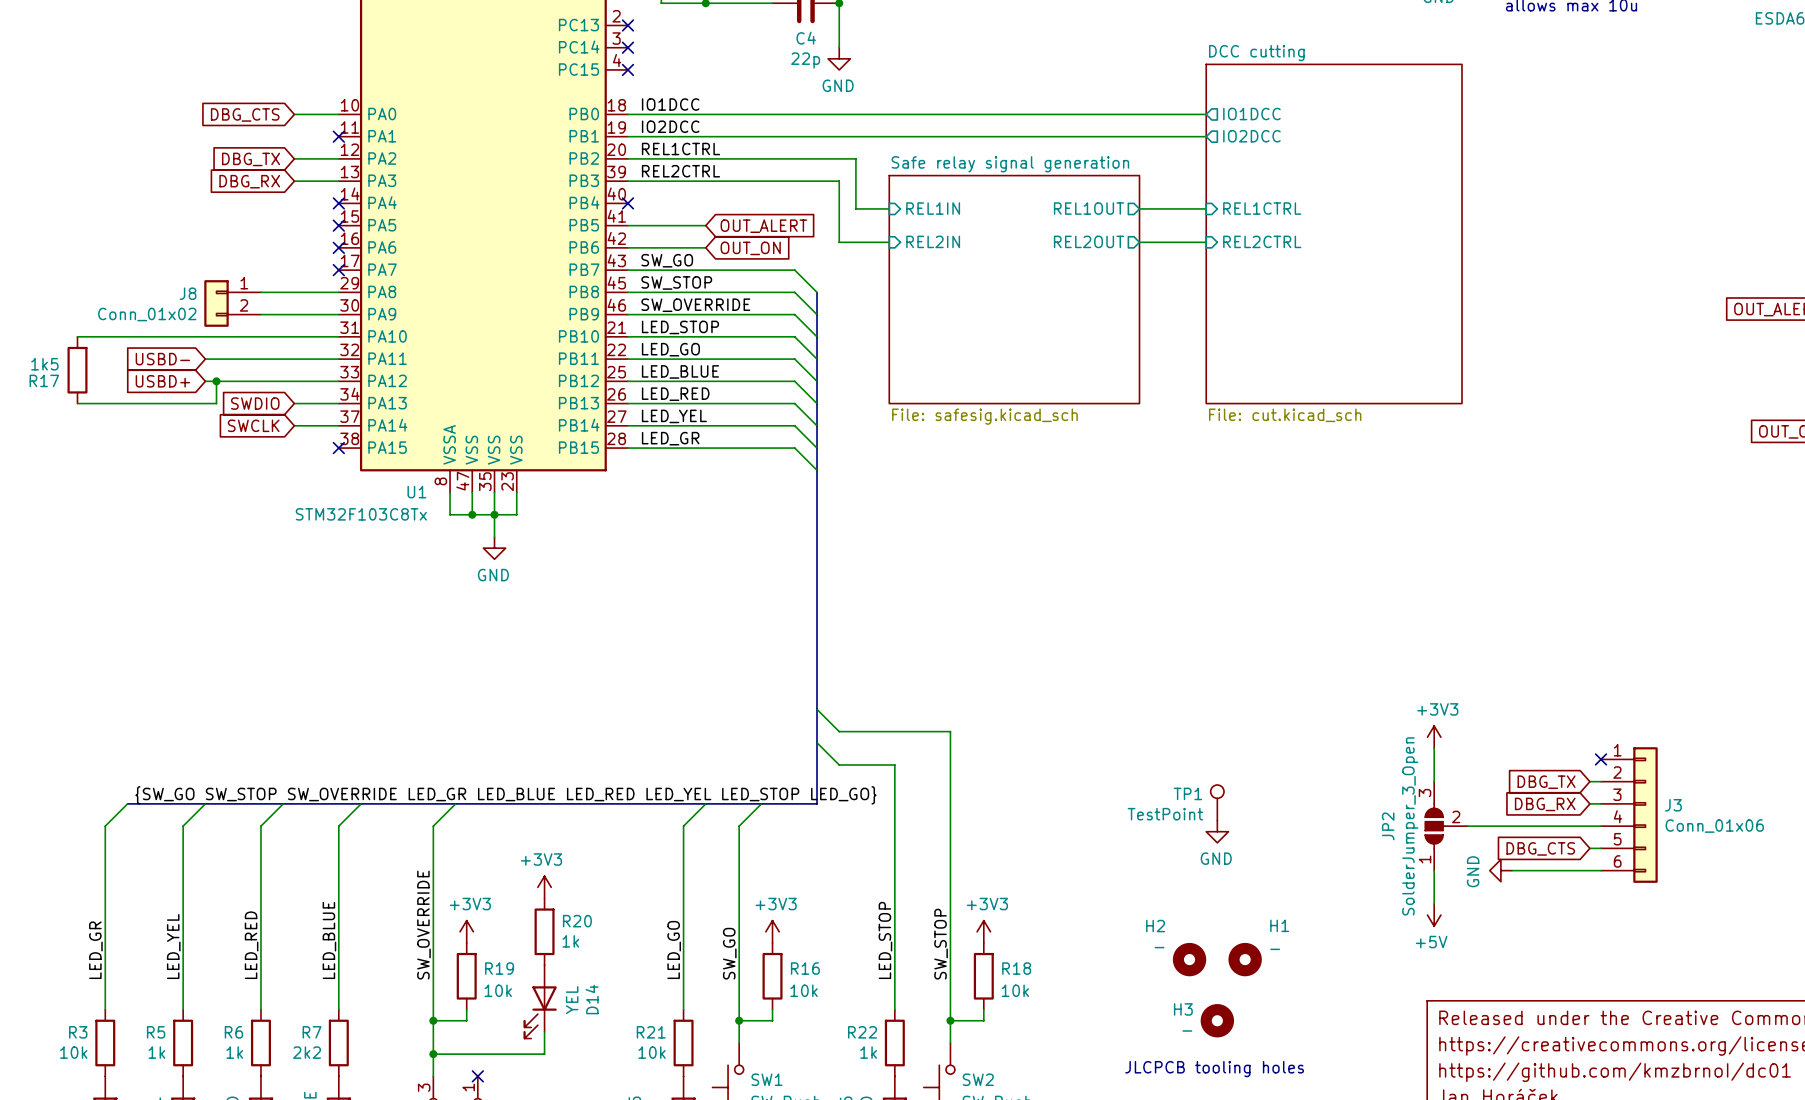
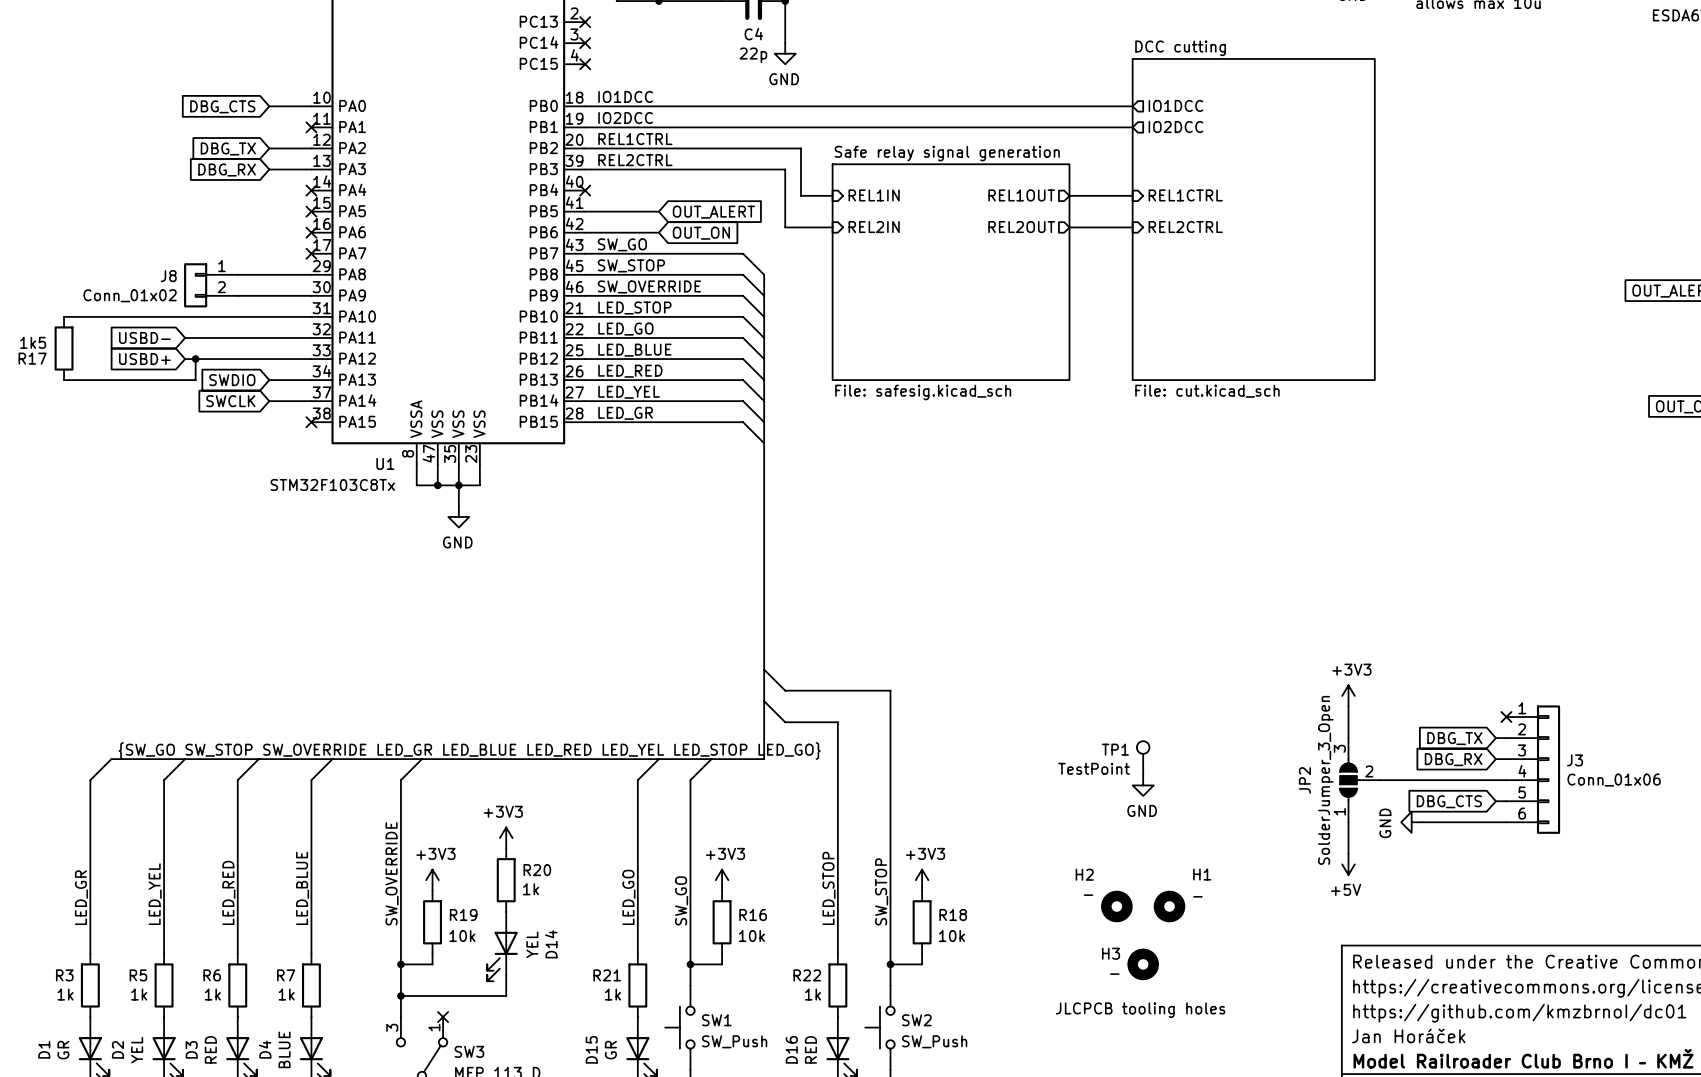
R3 value: 10k (73, 1052) -> 1k (65, 994)
R7 value: 2k2 (307, 1052) -> 1k (286, 994)
R21 value: 10k (652, 1052) -> 1k (612, 994)

